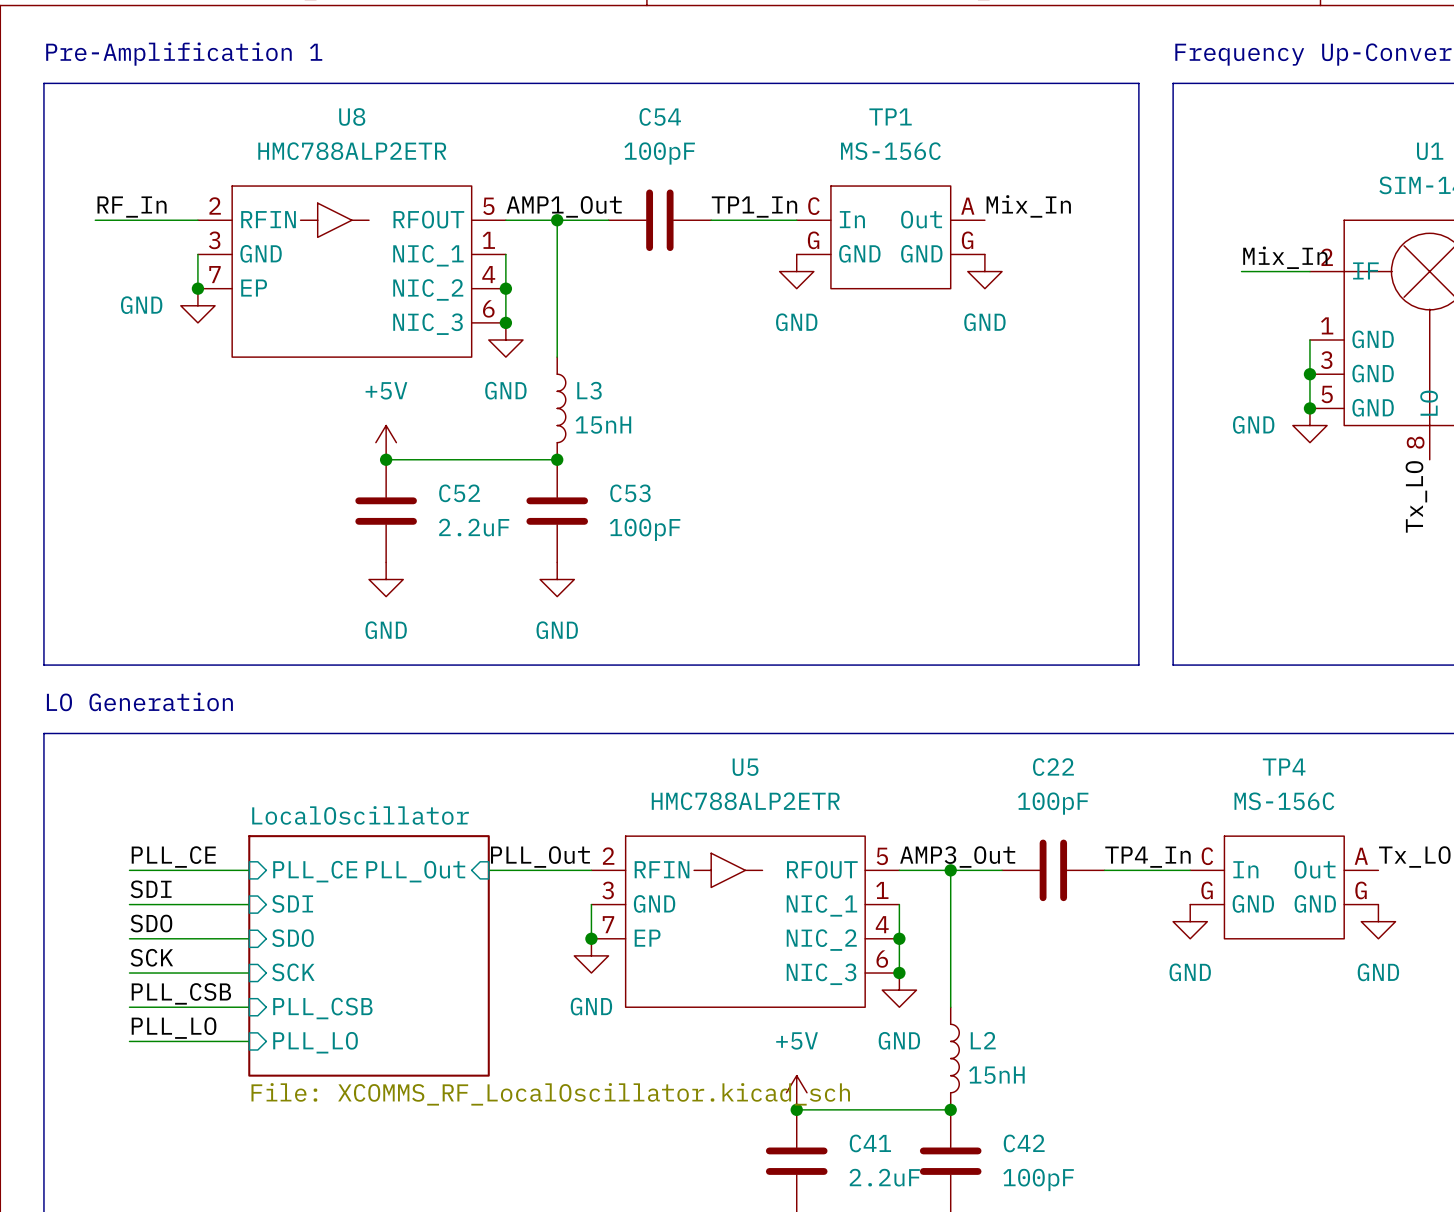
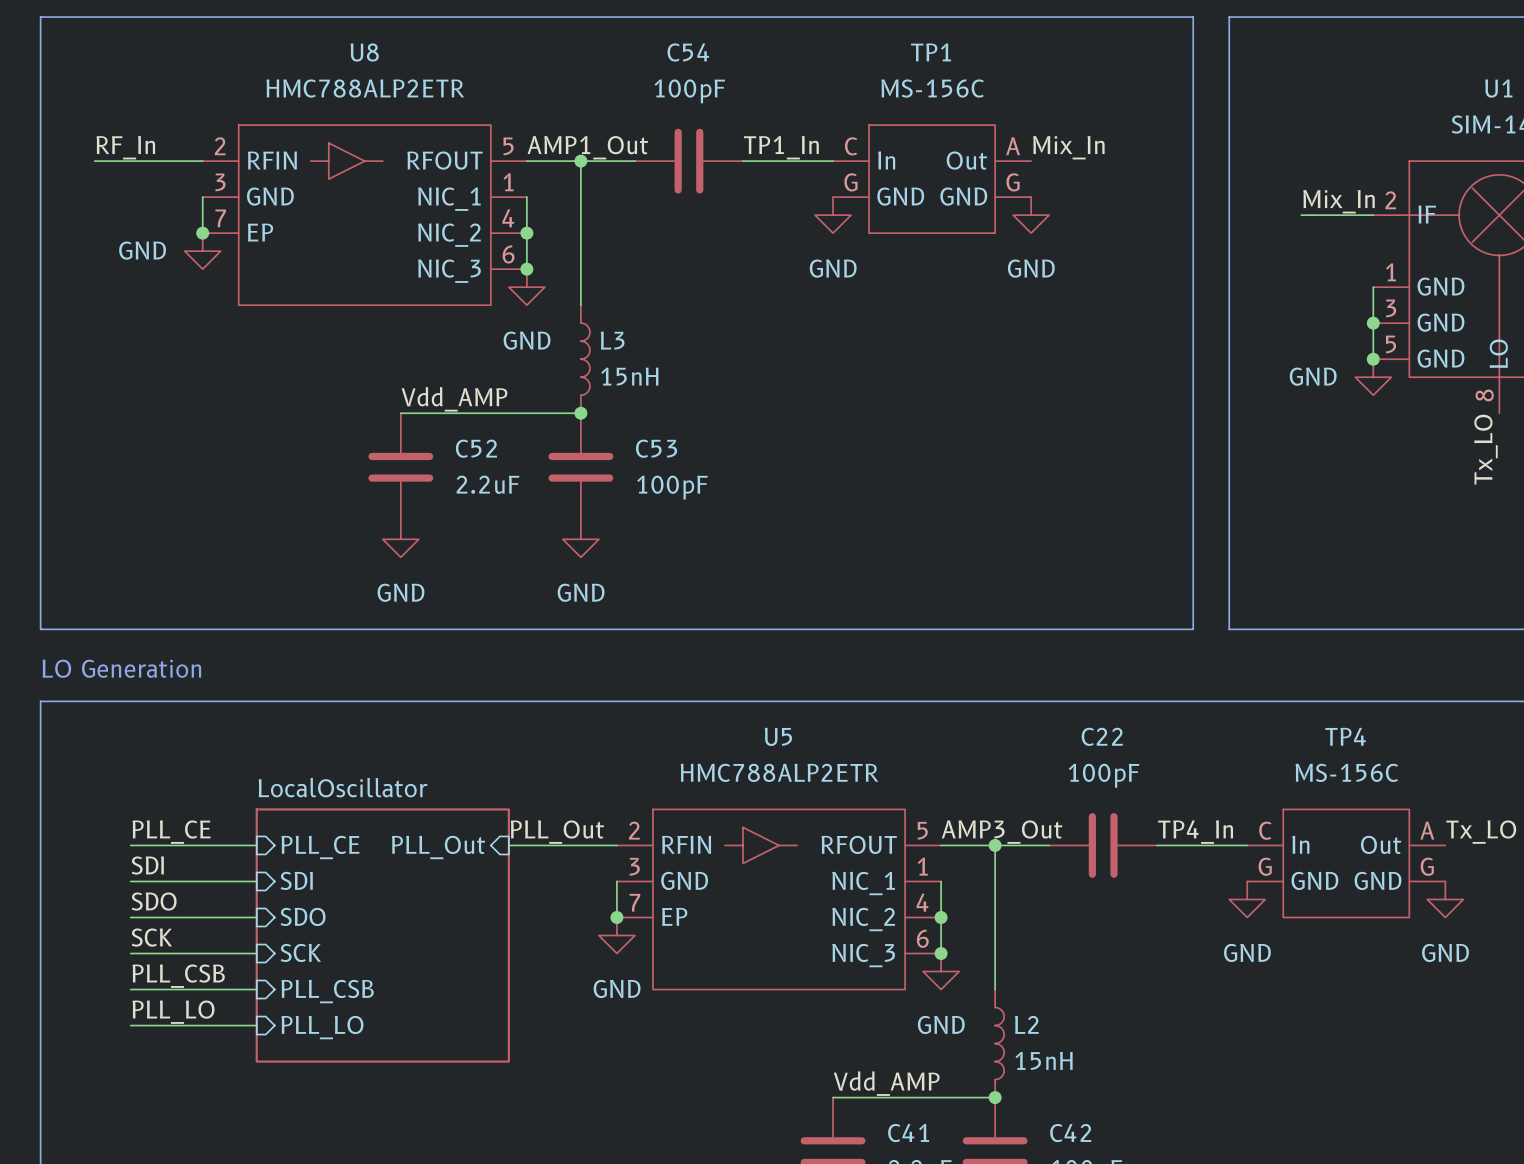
power symbol: +5V (386, 442) -> none
label: none -> Vdd_AMP (454, 399)
junction: (386, 459) -> none
power symbol: +5V (796, 1092) -> none
sheet LocalOscillator value: File: XCOMMS_RF_LocalOscillator.kicad_sch (550, 1094) -> none
label: none -> Vdd_AMP (886, 1083)
junction: (796, 1109) -> none

